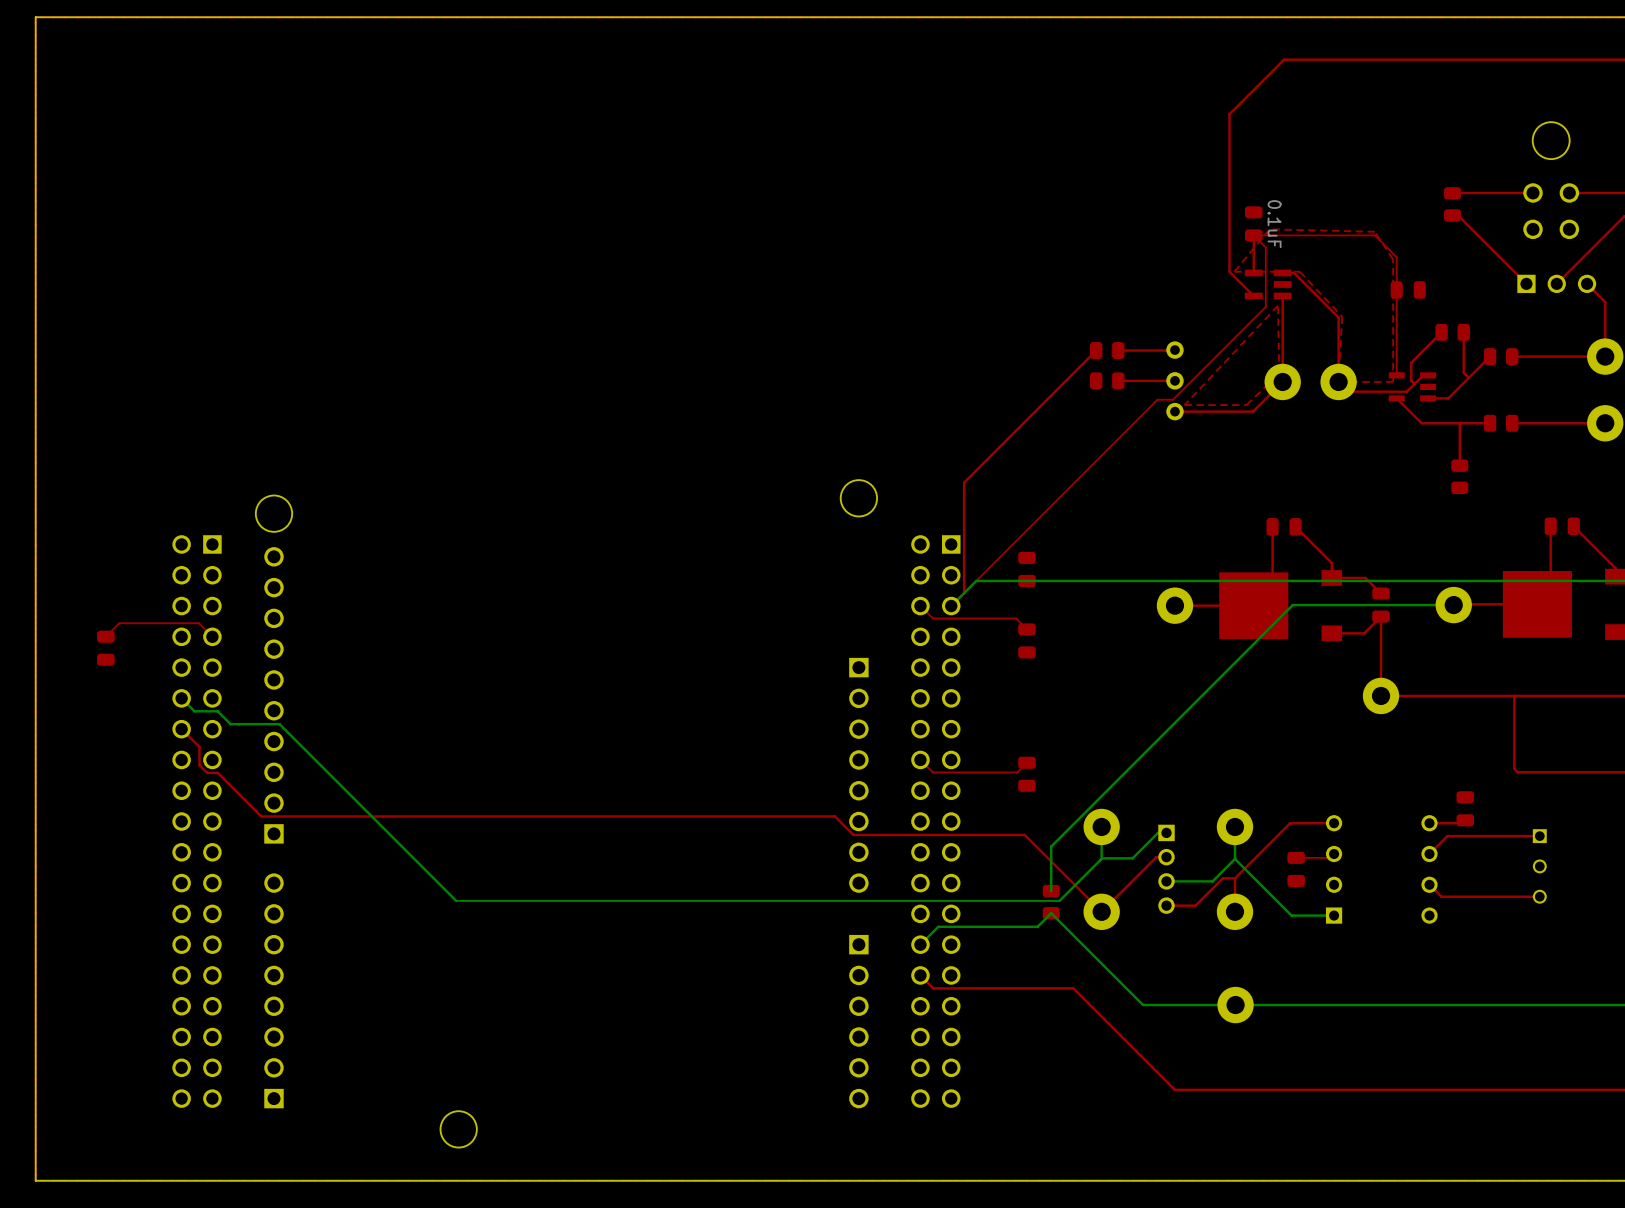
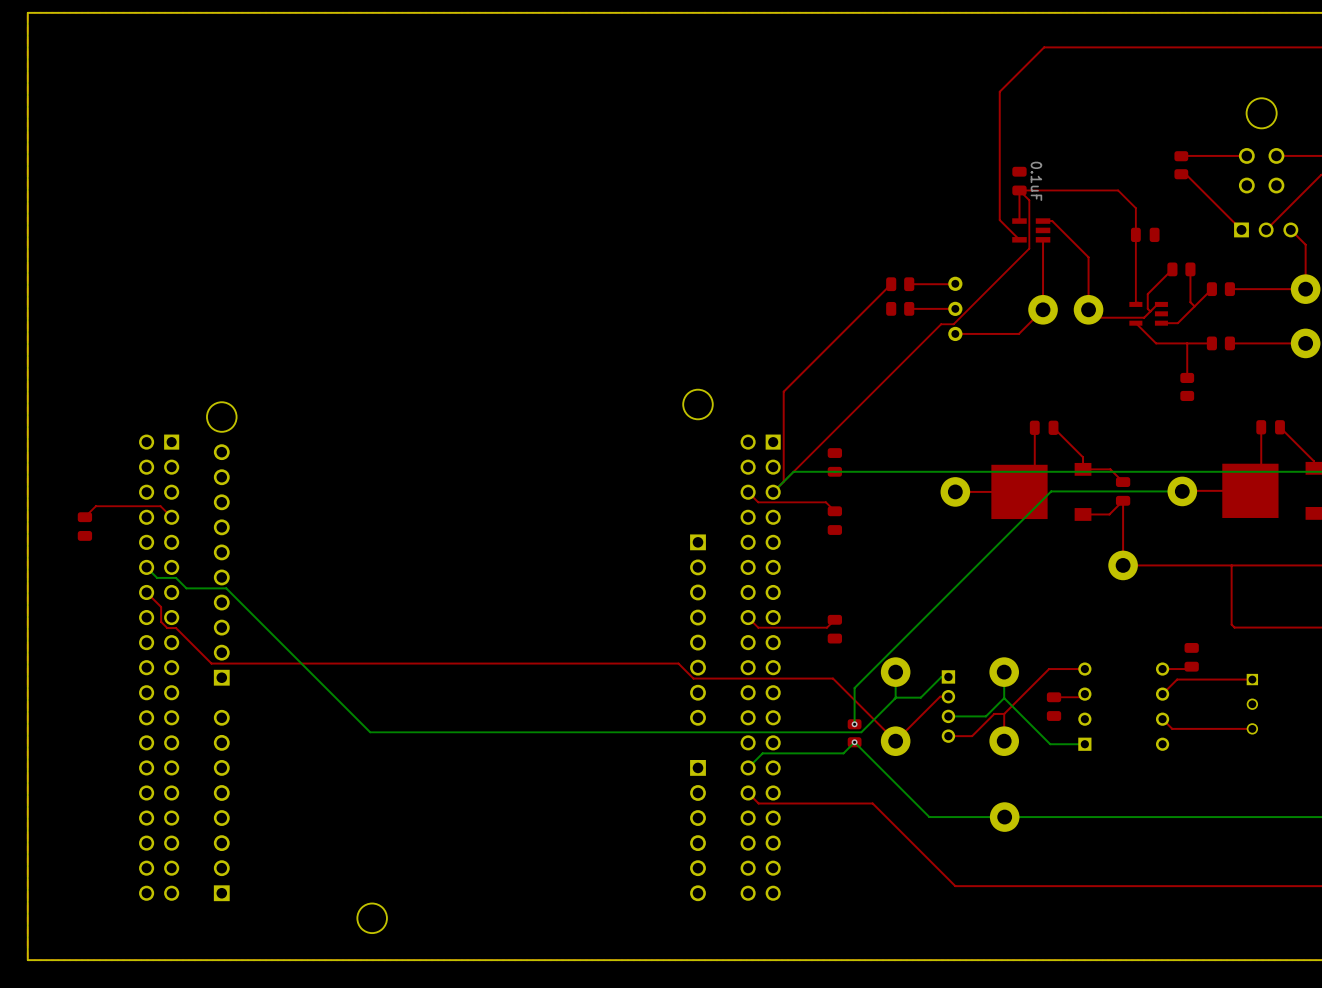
top zone outline: (1269, 229) (1374, 231) (1393, 259) (1393, 381) (1338, 381) (1342, 316) (1299, 271) (1234, 271) (1269, 229) -> none
top zone outline: (1278, 305) (1279, 373) (1246, 405) (1184, 405) (1278, 305) -> none
via: none -> (854, 724)
via: none -> (854, 742)

